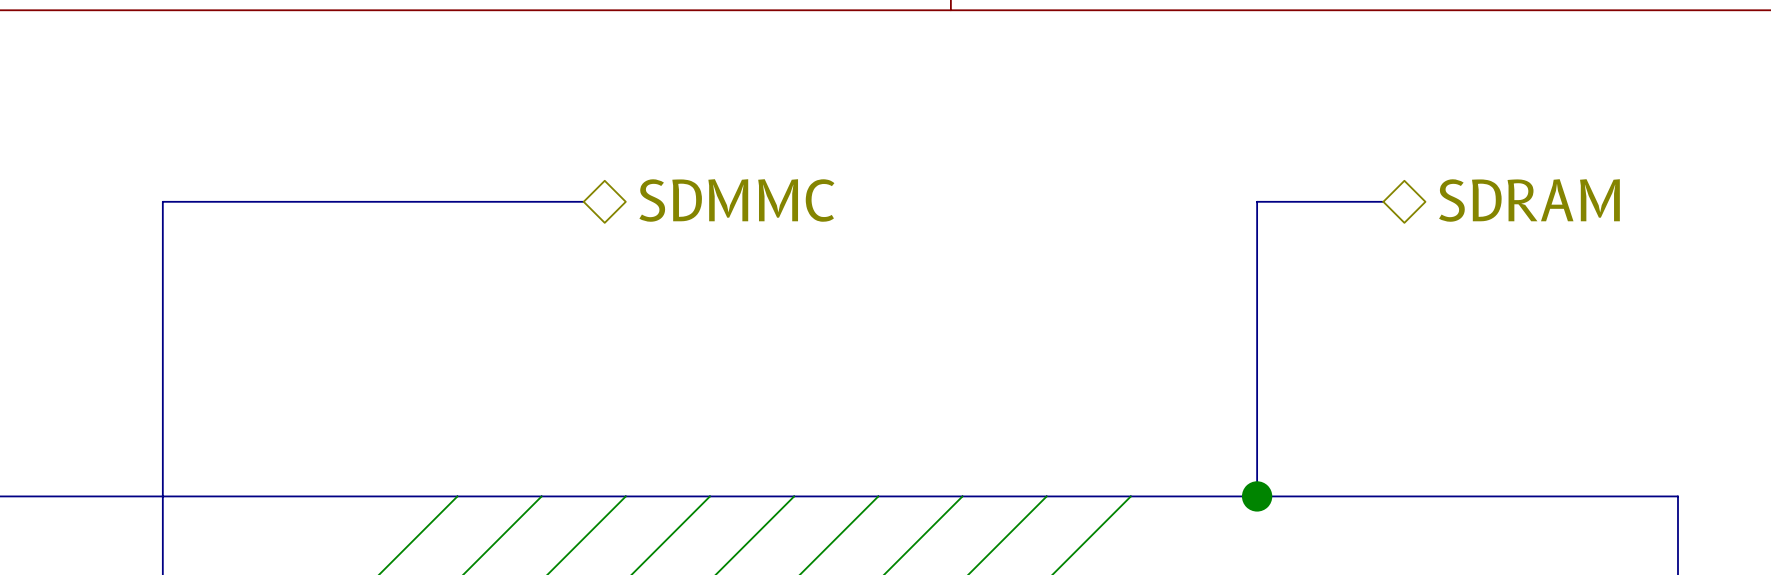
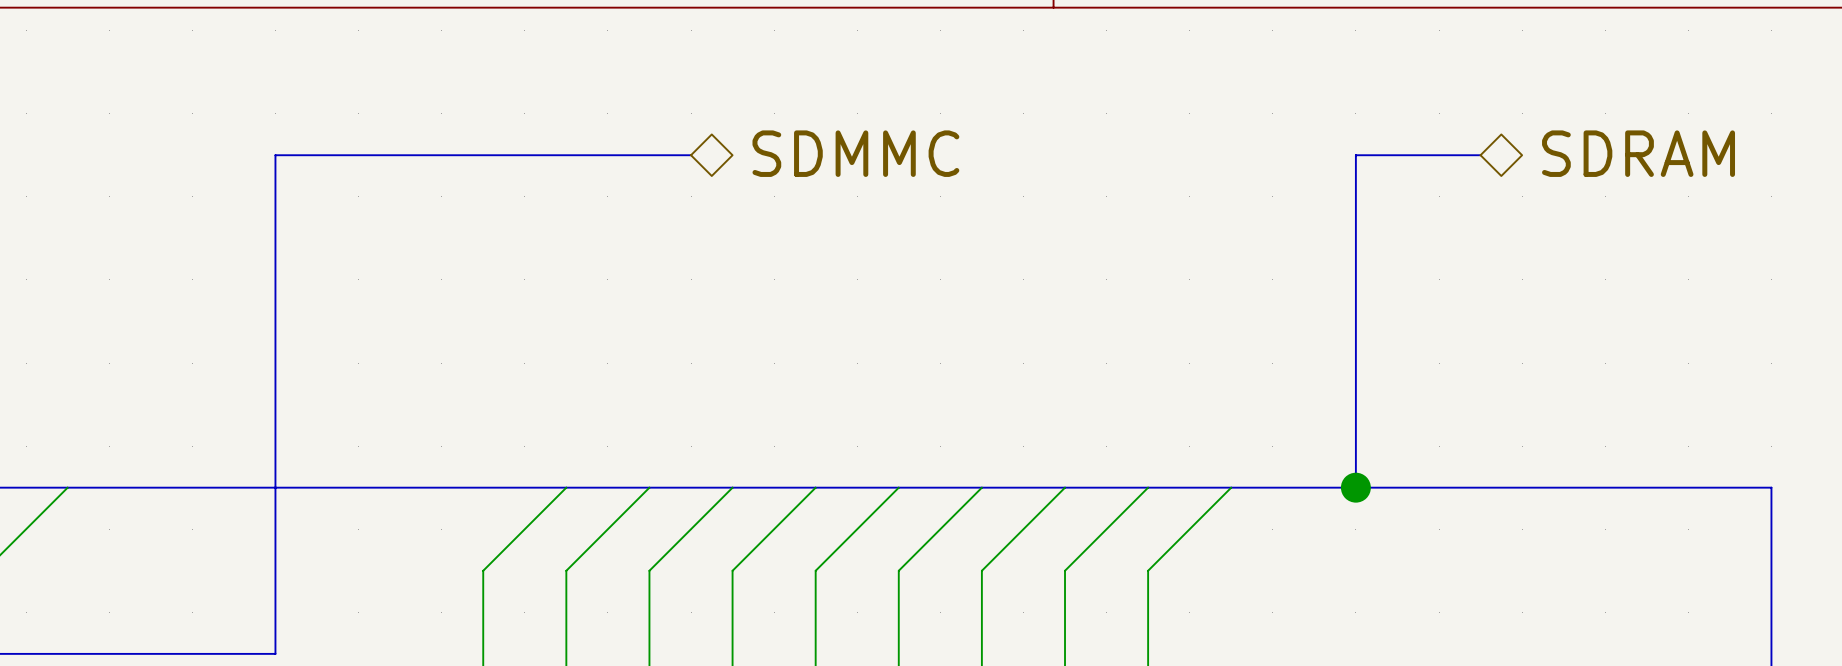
hierarchical label position: SDMMC (736, 200) -> SDMMC (855, 153)
hierarchical label position: SDRAM (1529, 200) -> SDRAM (1638, 153)
bus: (162, 201) (583, 201) -> (275, 196) (275, 155) (691, 155)
bus: (1257, 201) (1383, 201) -> (1355, 196) (1355, 155) (1480, 155)

